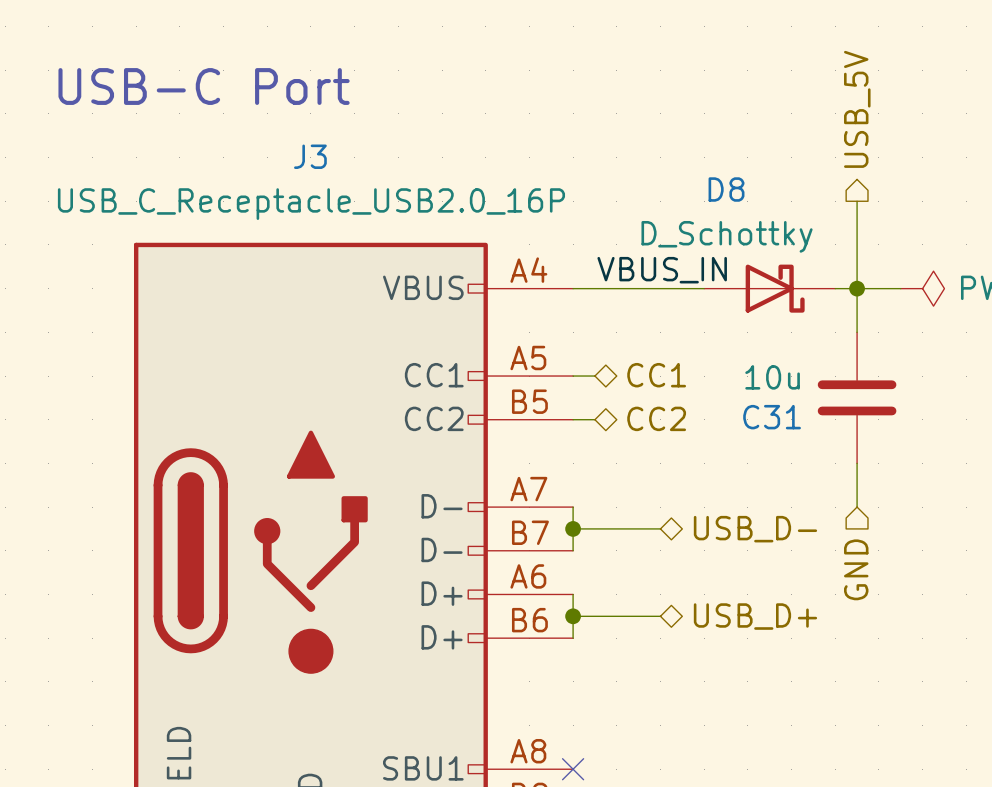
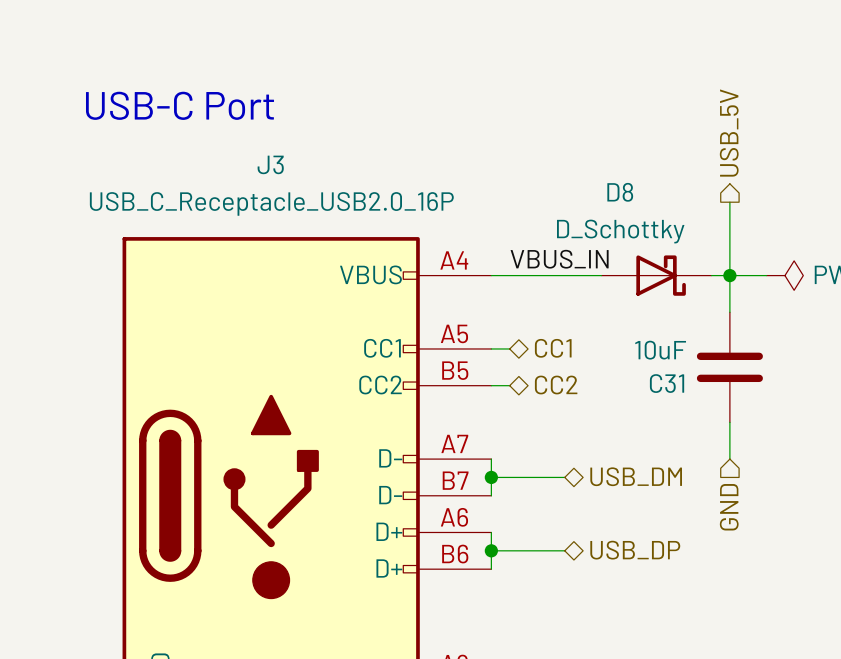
C31 value: 10u (772, 377) -> 10uF (660, 350)
hierarchical label: USB_D- (755, 529) -> USB_DM (636, 476)
hierarchical label: USB_D+ (755, 616) -> USB_DP (635, 550)

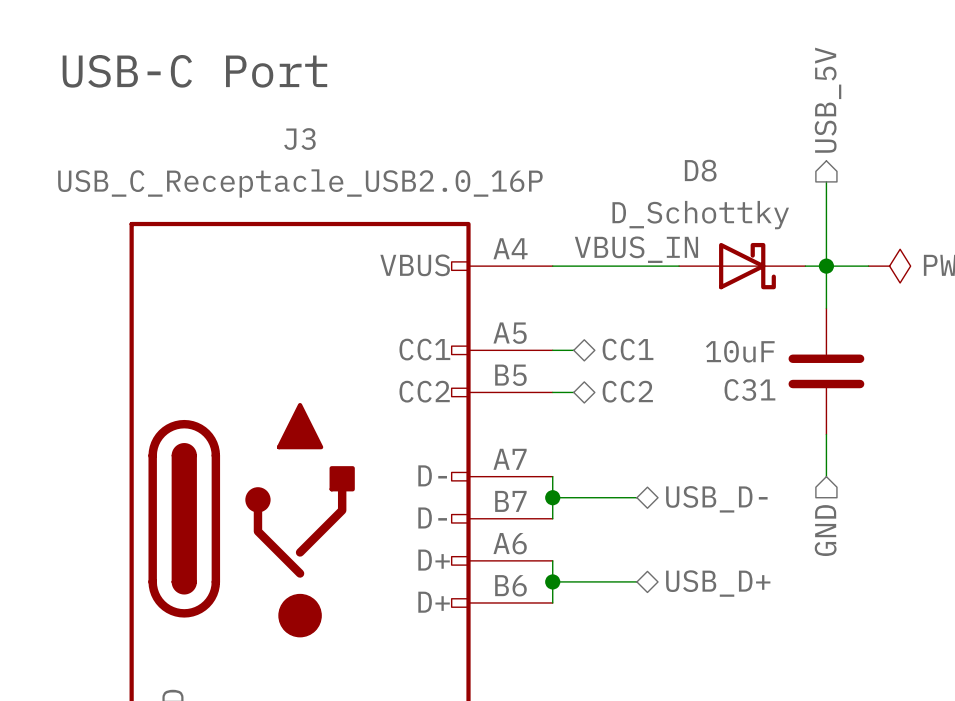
hierarchical label: USB_DM (636, 476) -> USB_D- (716, 499)
hierarchical label: USB_DP (635, 550) -> USB_D+ (718, 583)

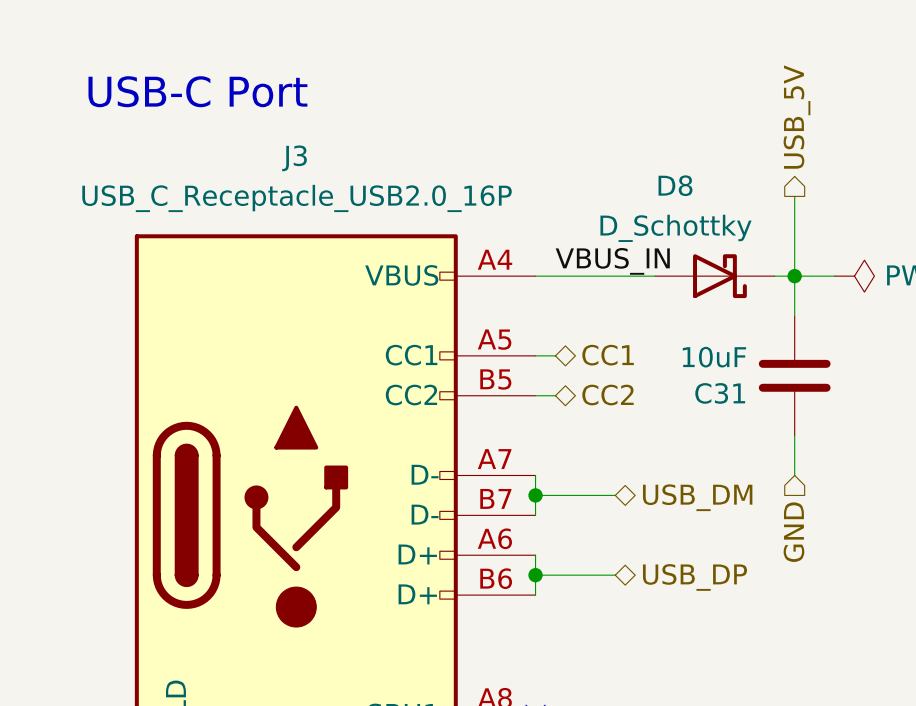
hierarchical label: USB_D- (716, 499) -> USB_DM (697, 497)
hierarchical label: USB_D+ (718, 583) -> USB_DP (694, 577)

